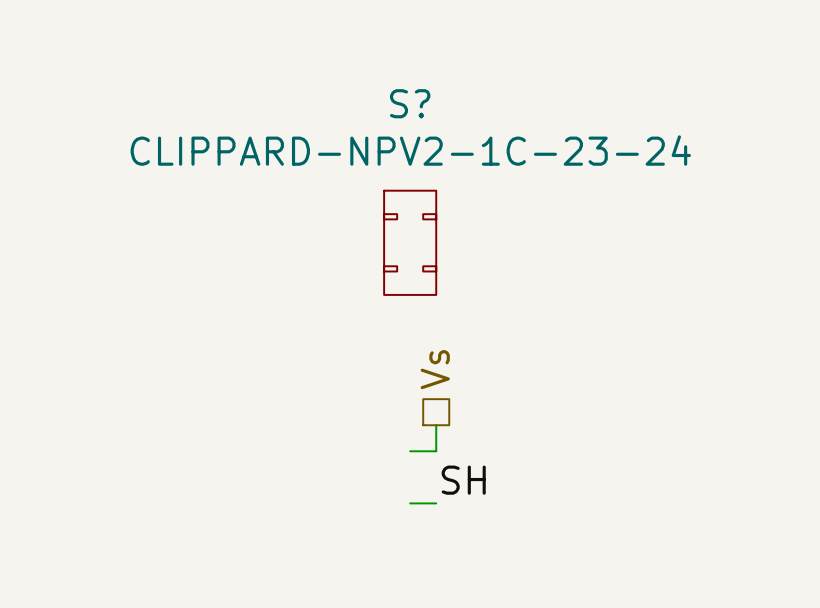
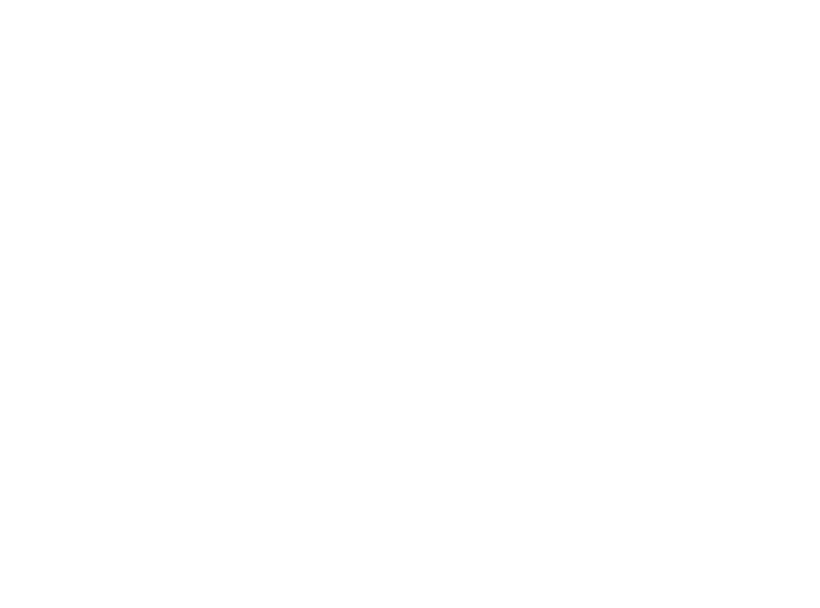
S?: CLIPPARD-NPV2-1C-23-24 (410, 242) -> none
hierarchical label: Vs (435, 369) -> none
wire: (436, 425) (436, 451) (410, 451) -> none
label: SH (463, 480) -> none
wire: (410, 503) (436, 503) -> none

